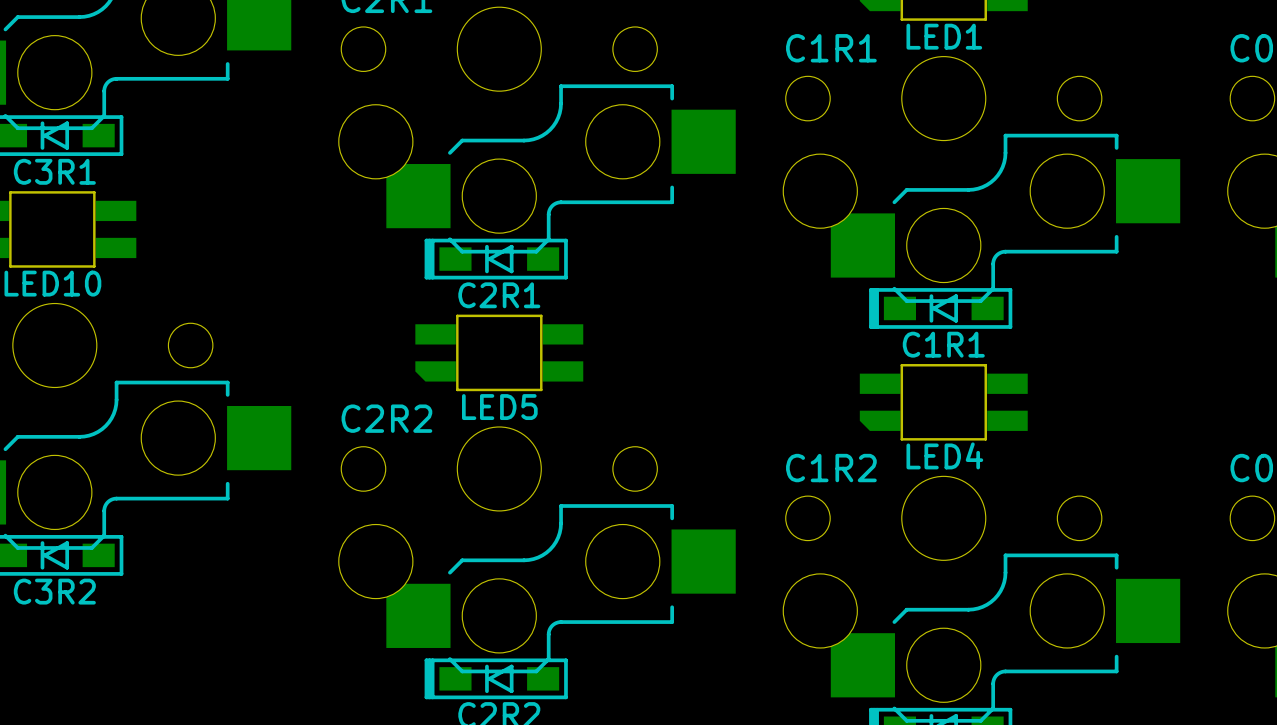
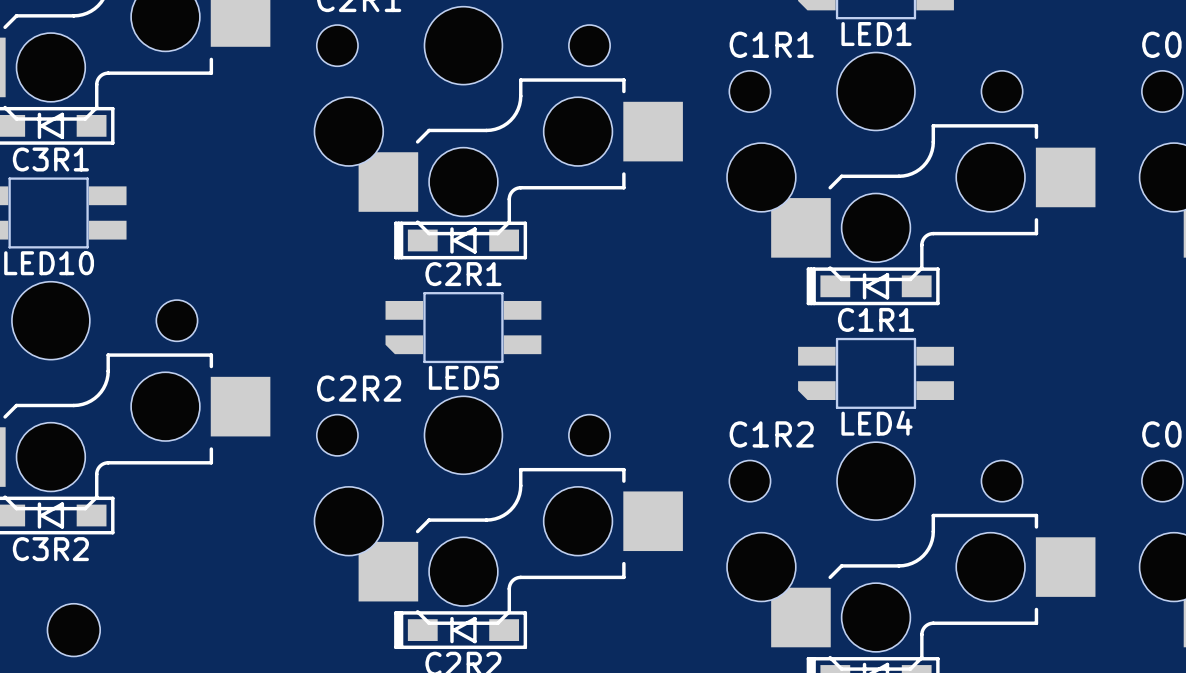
part: none -> (73, 630)

